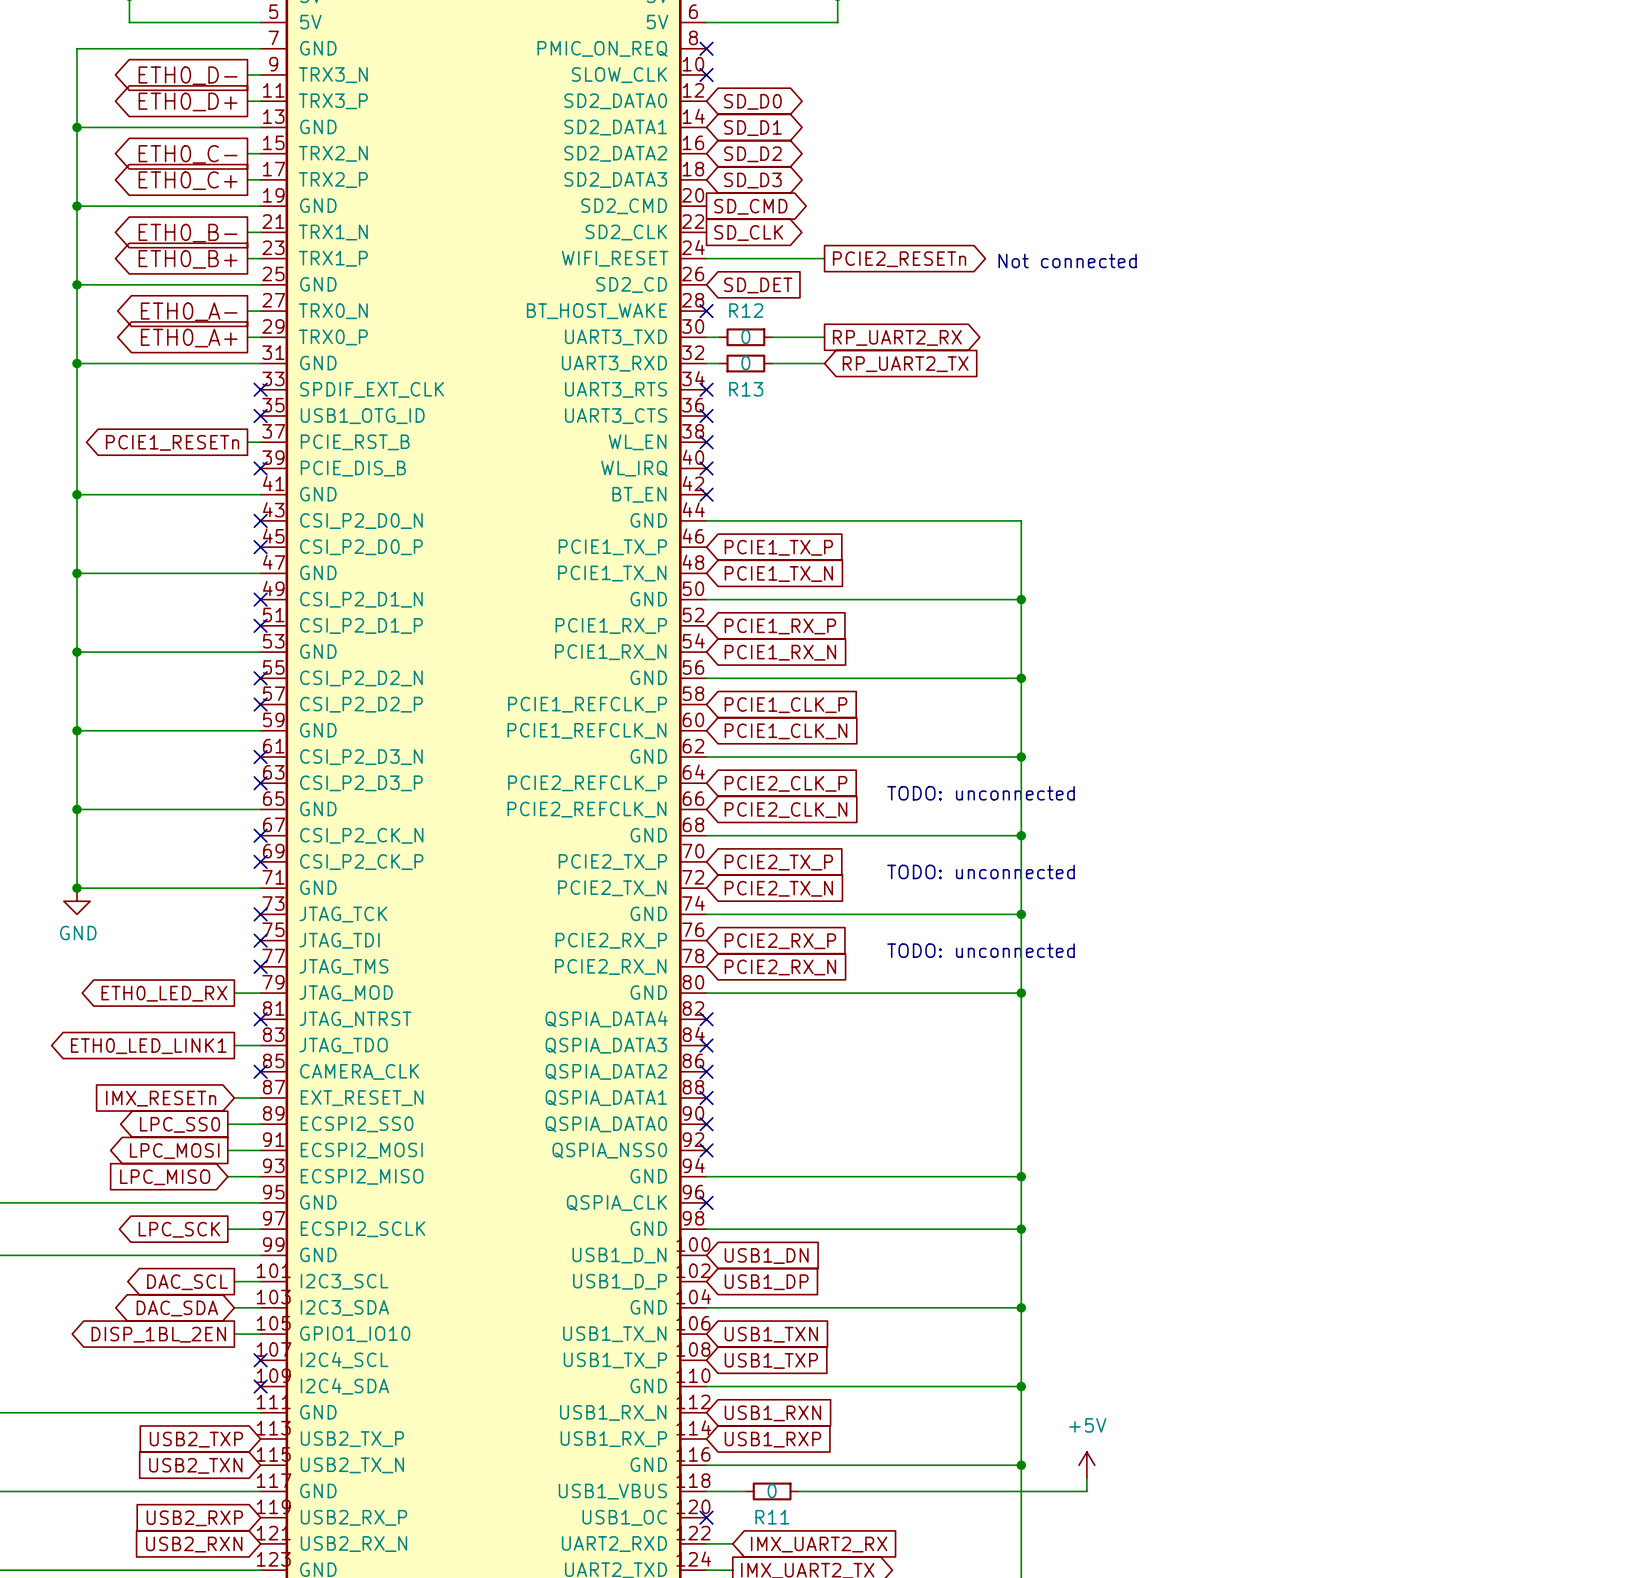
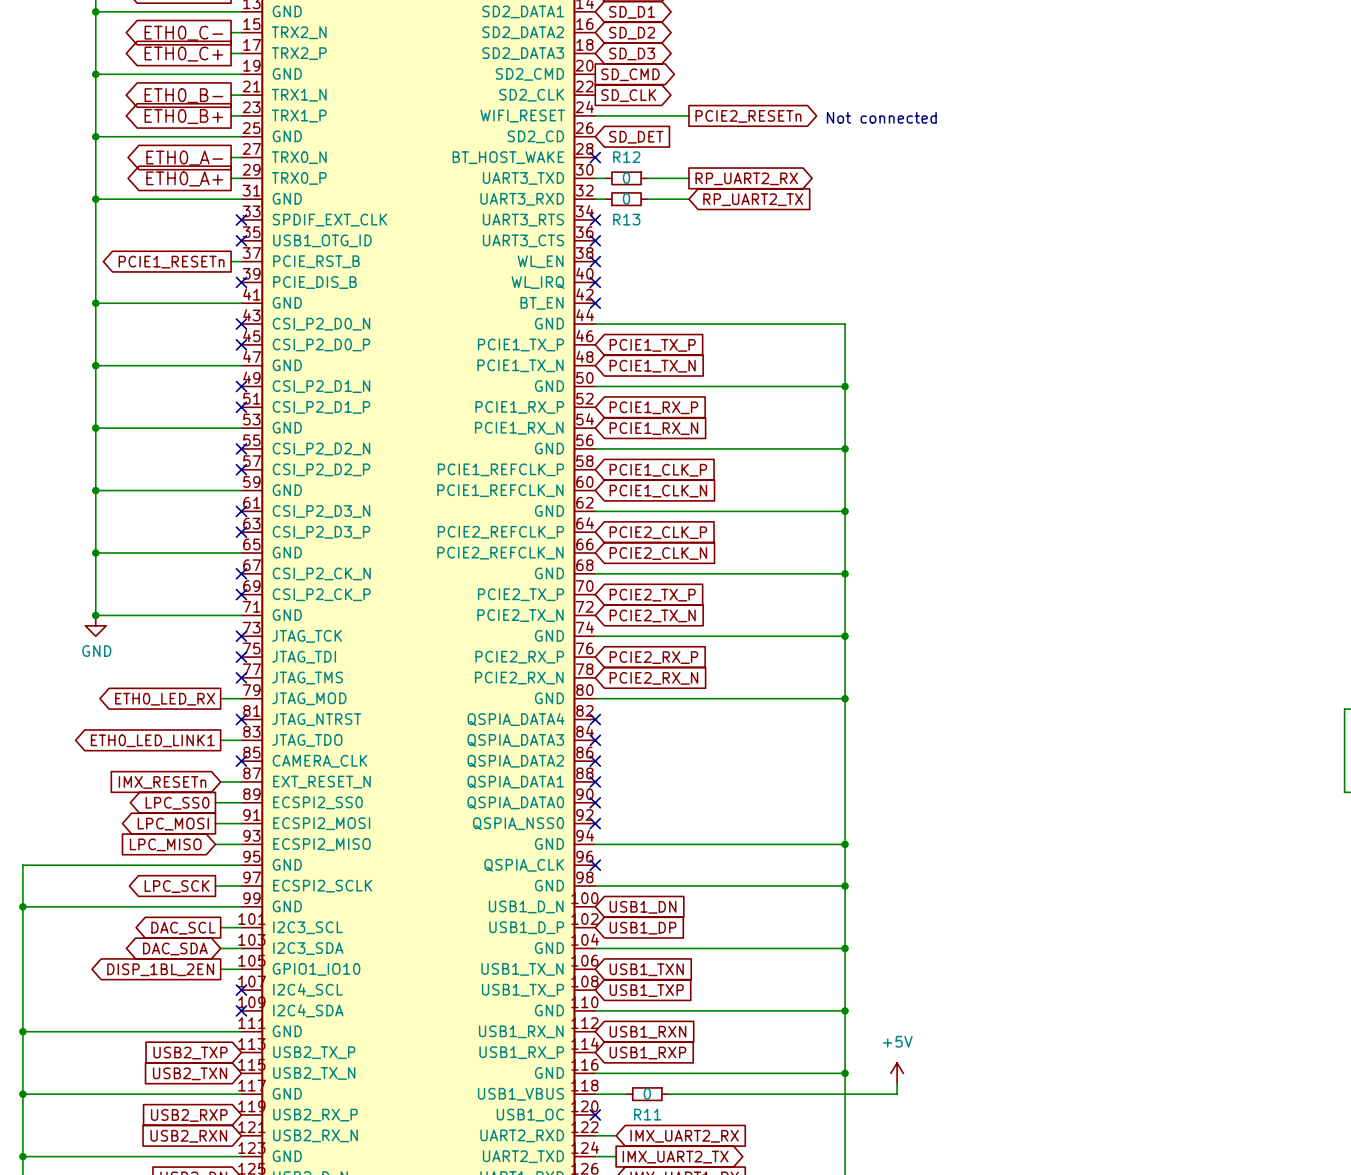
text: TODO: unconnected (981, 793) -> none
text: TODO: unconnected (981, 871) -> none
text: TODO: unconnected (981, 950) -> none

